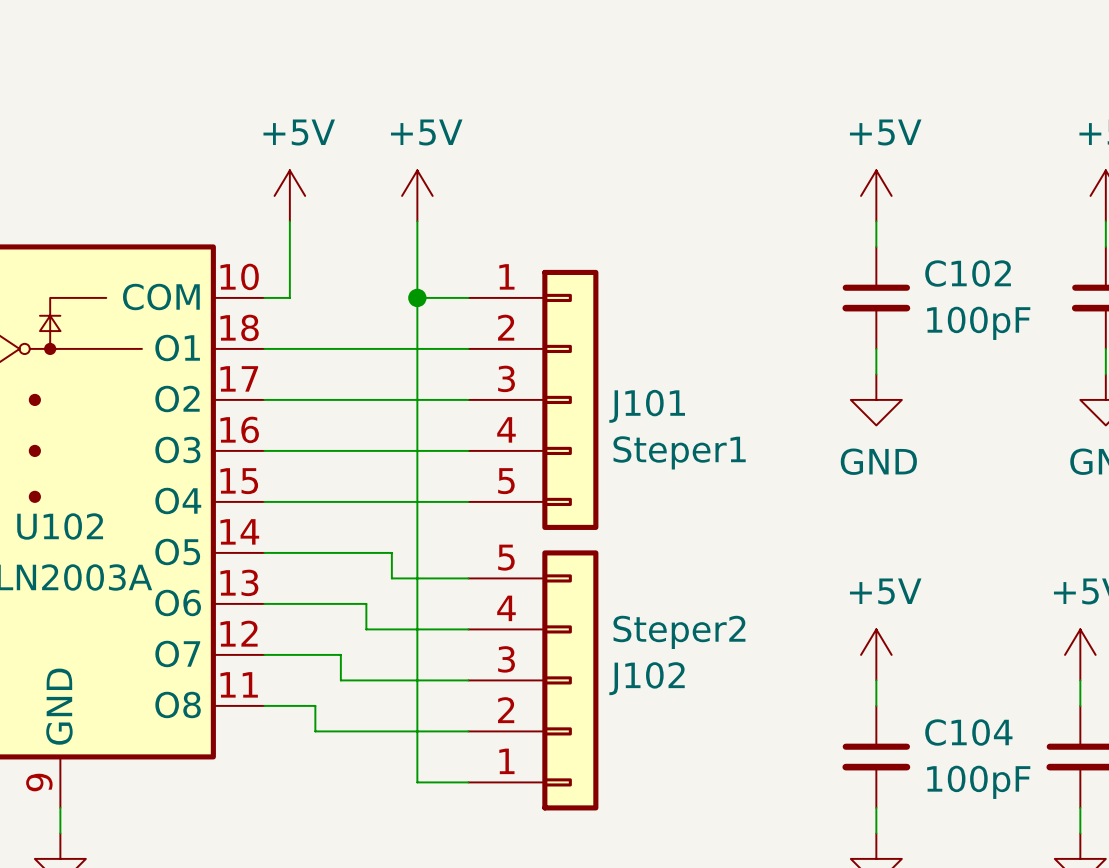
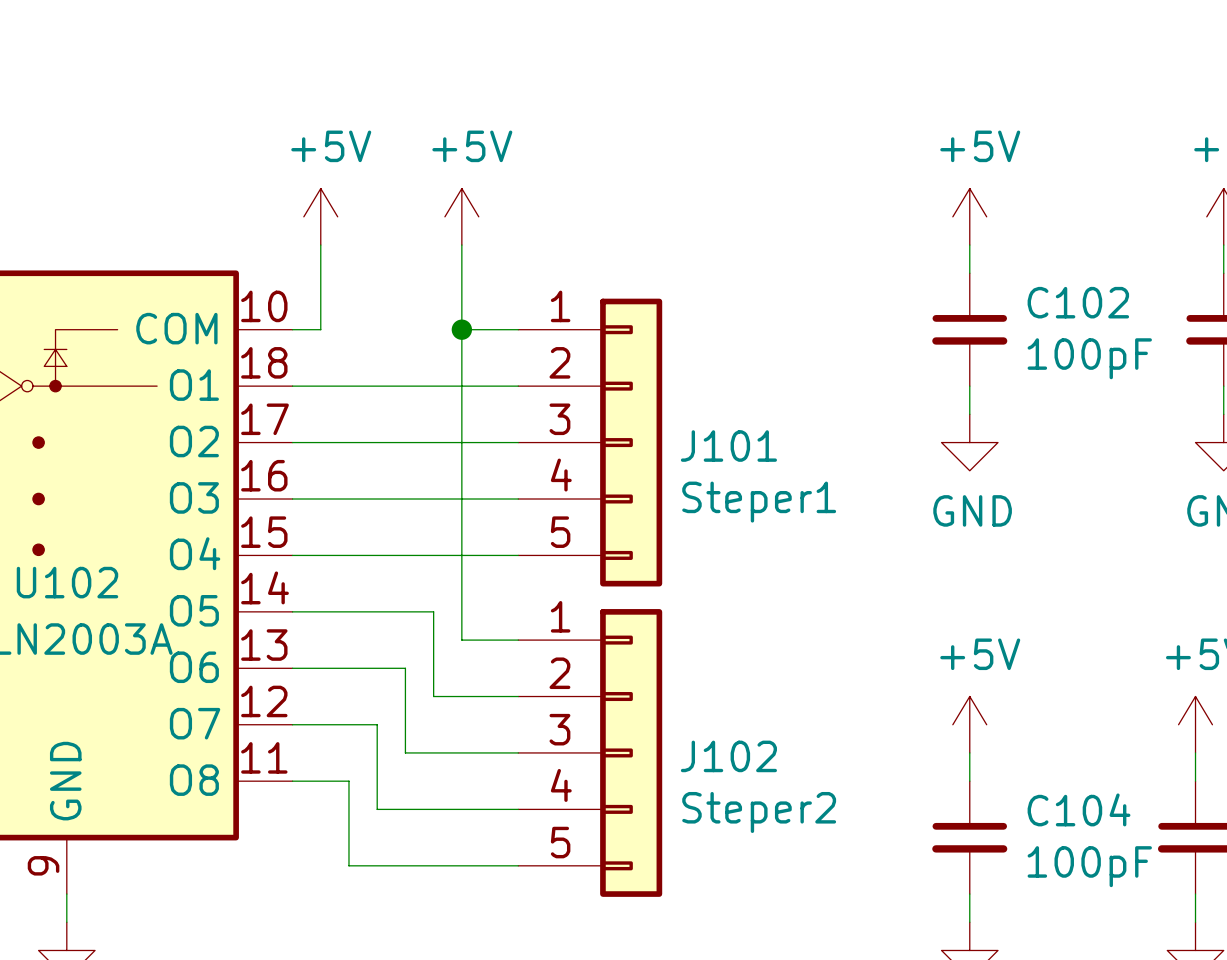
wire: (391, 578) (417, 578) (417, 782) -> (348, 809) (348, 865) (461, 865)
wire: (366, 629) (391, 629) -> (433, 640) (433, 696)
wire: (340, 680) (366, 680) -> (405, 696) (405, 752)
J102 flip: as is (570, 680) -> up-down (631, 752)
wire: (315, 731) (340, 731) -> (377, 752) (377, 809)

